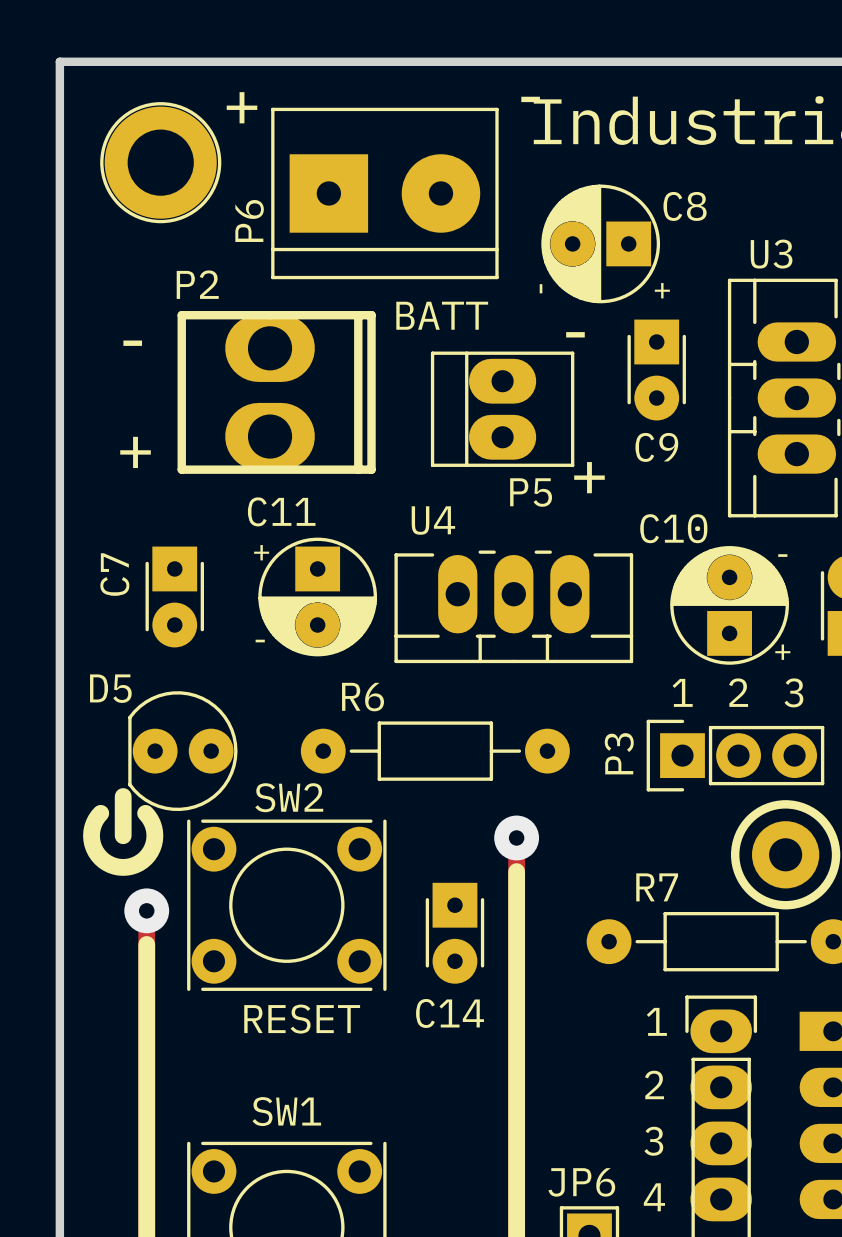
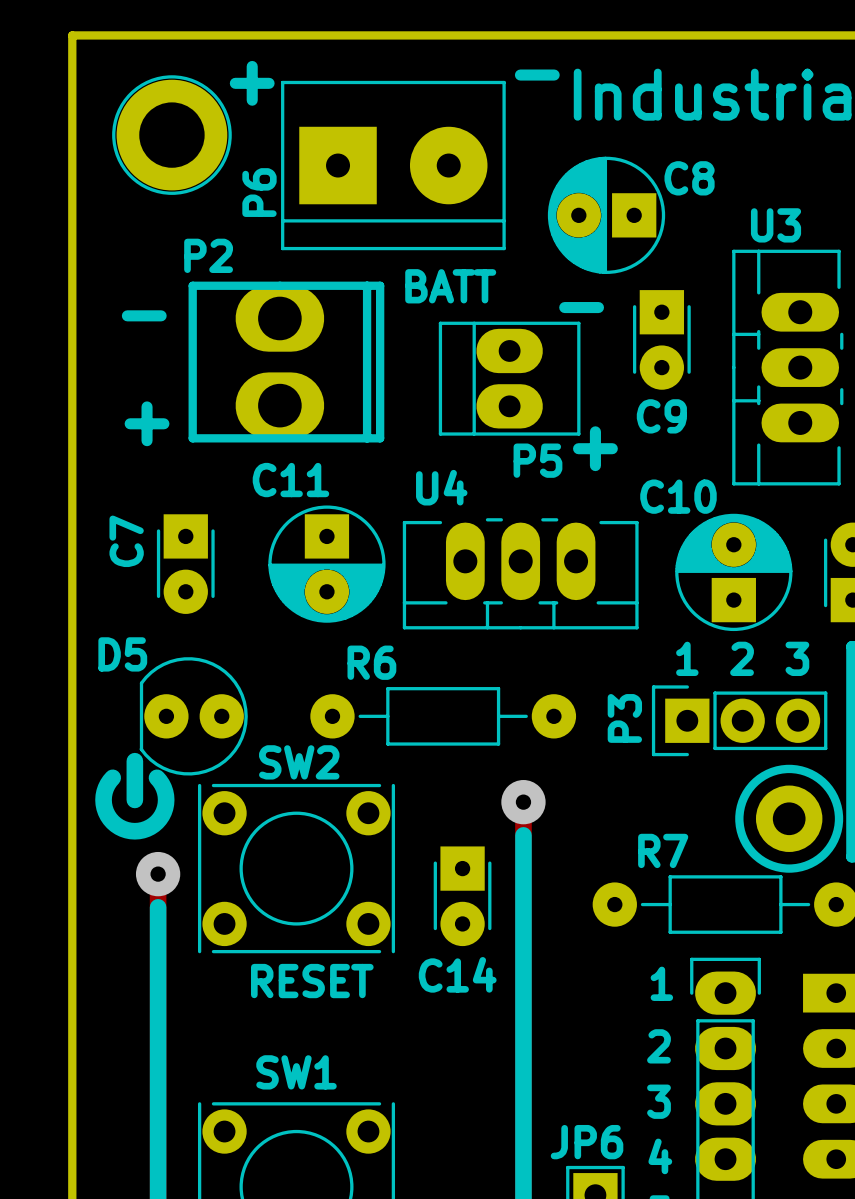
text: - (541, 288) -> none
text: + (662, 290) -> none
text: + (261, 552) -> none
text: - (782, 555) -> none
text: - (260, 641) -> none
text: + (782, 652) -> none

